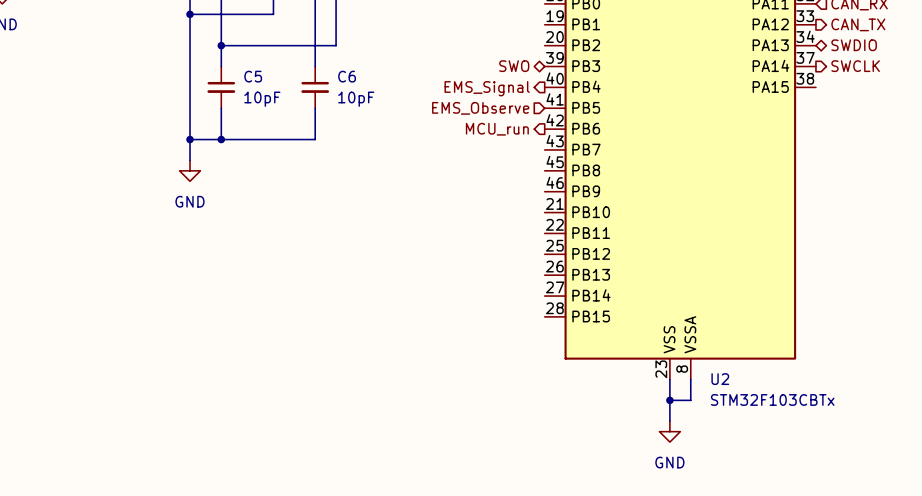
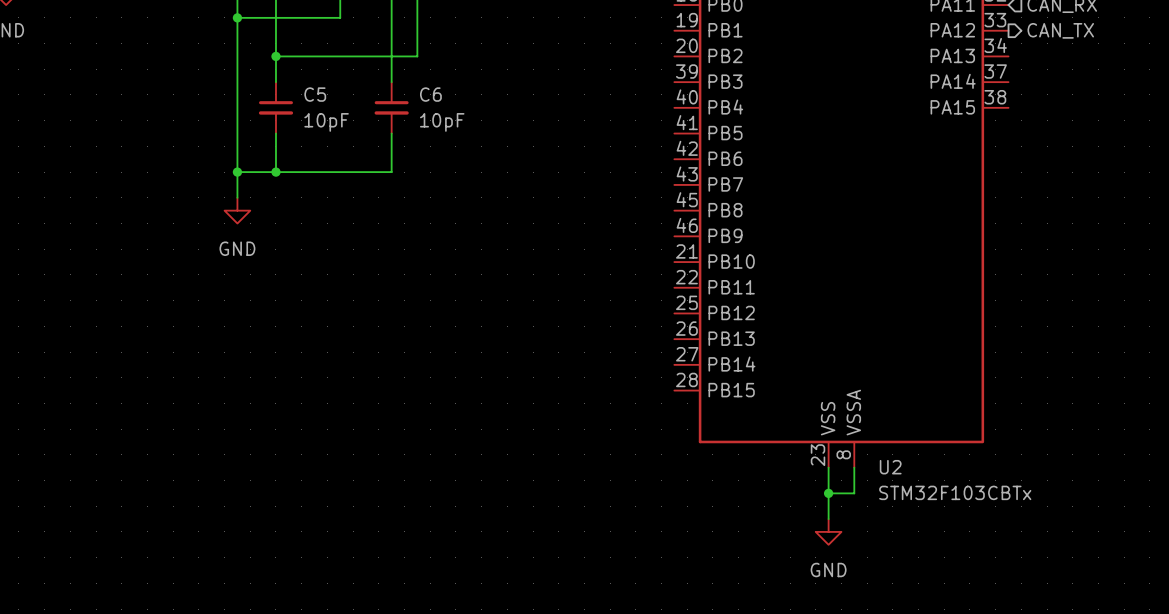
hierarchical label: SWDIO (854, 45) -> none
hierarchical label: SWO (514, 66) -> none
hierarchical label: SWCLK (855, 66) -> none
hierarchical label: EMS_Signal (487, 88) -> none
hierarchical label: EMS_Observe (480, 108) -> none
hierarchical label: MCU_run (497, 129) -> none

